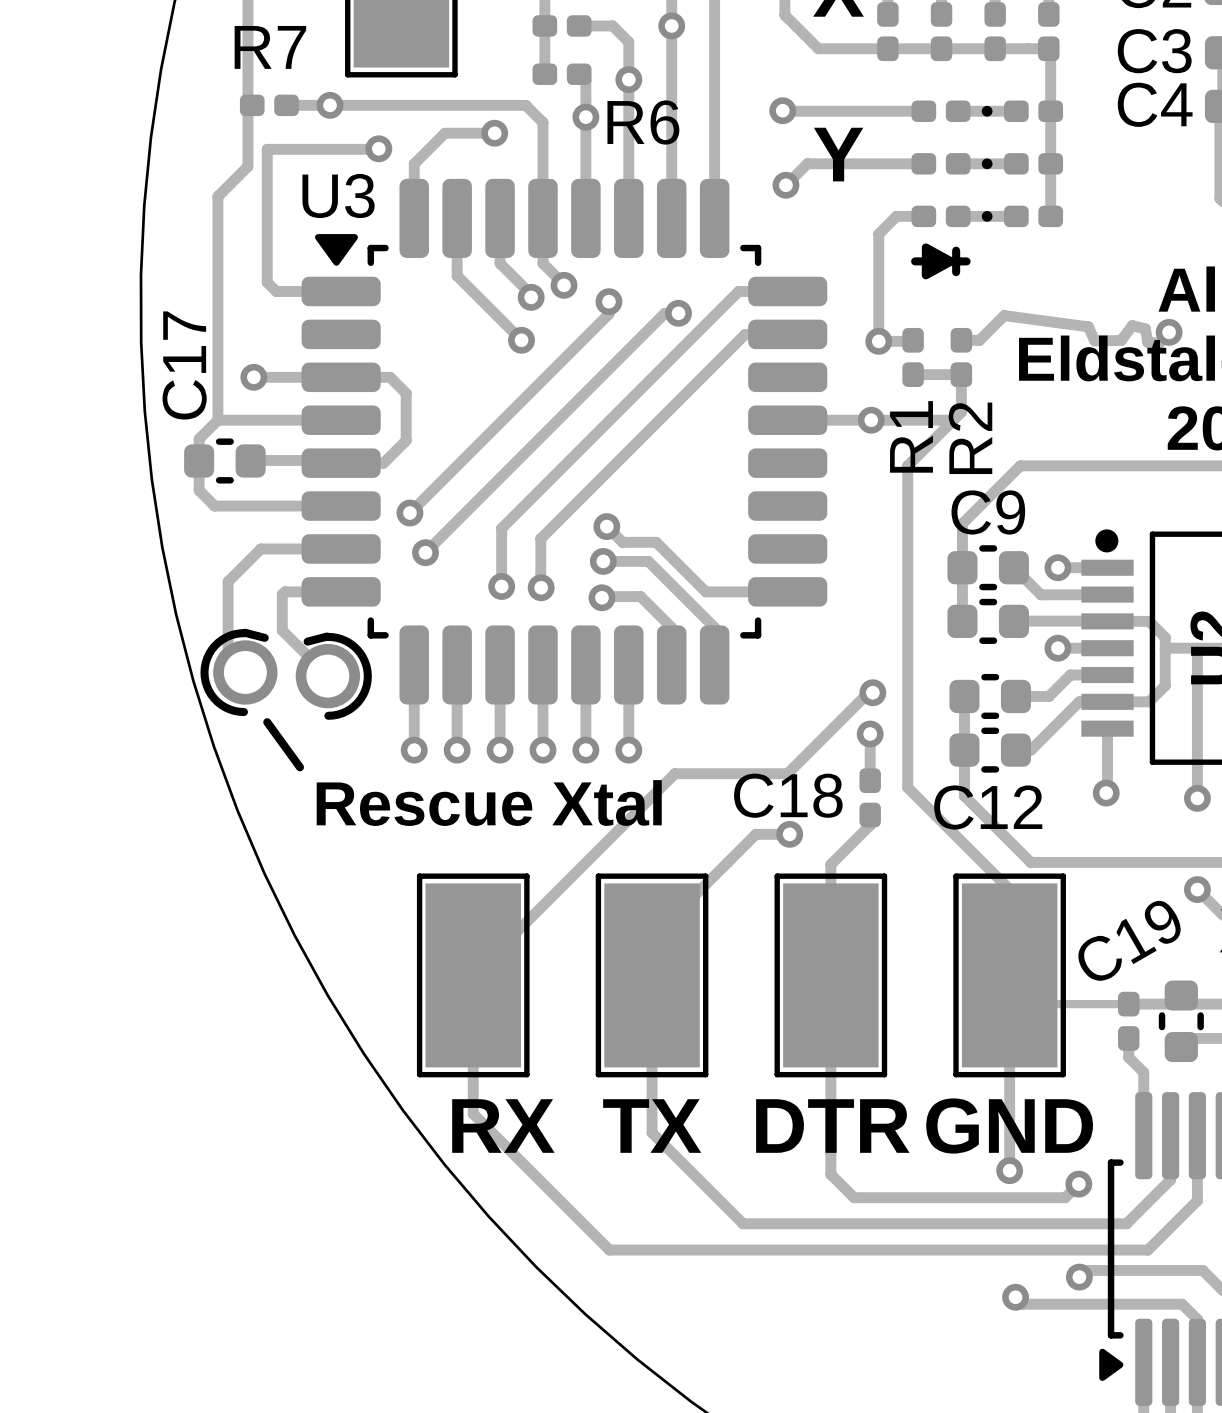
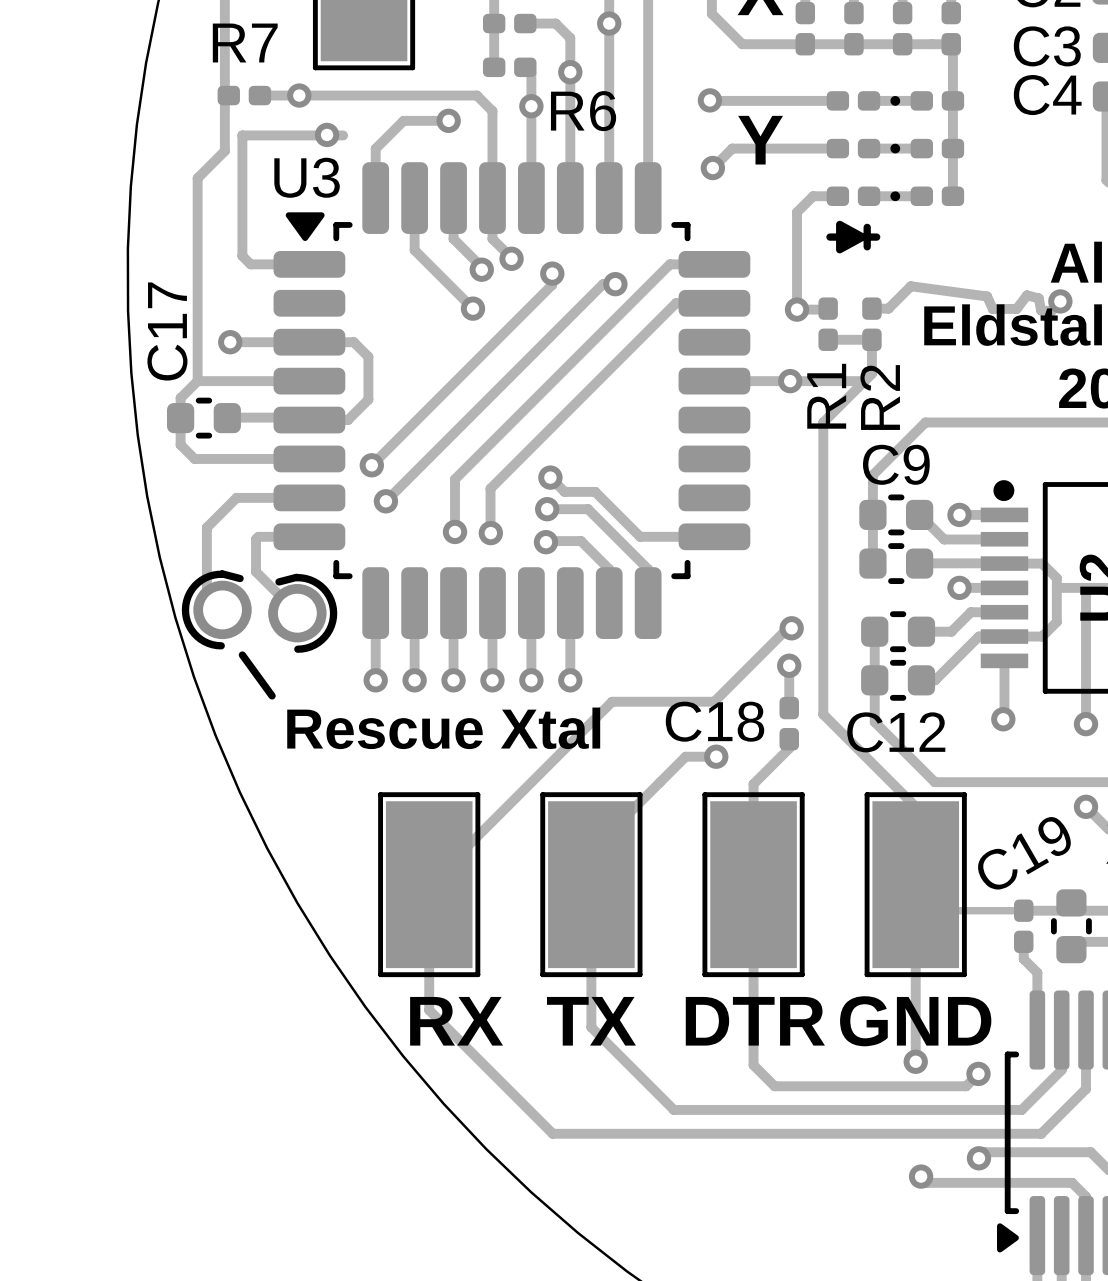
via position: (378, 148) -> (327, 134)

